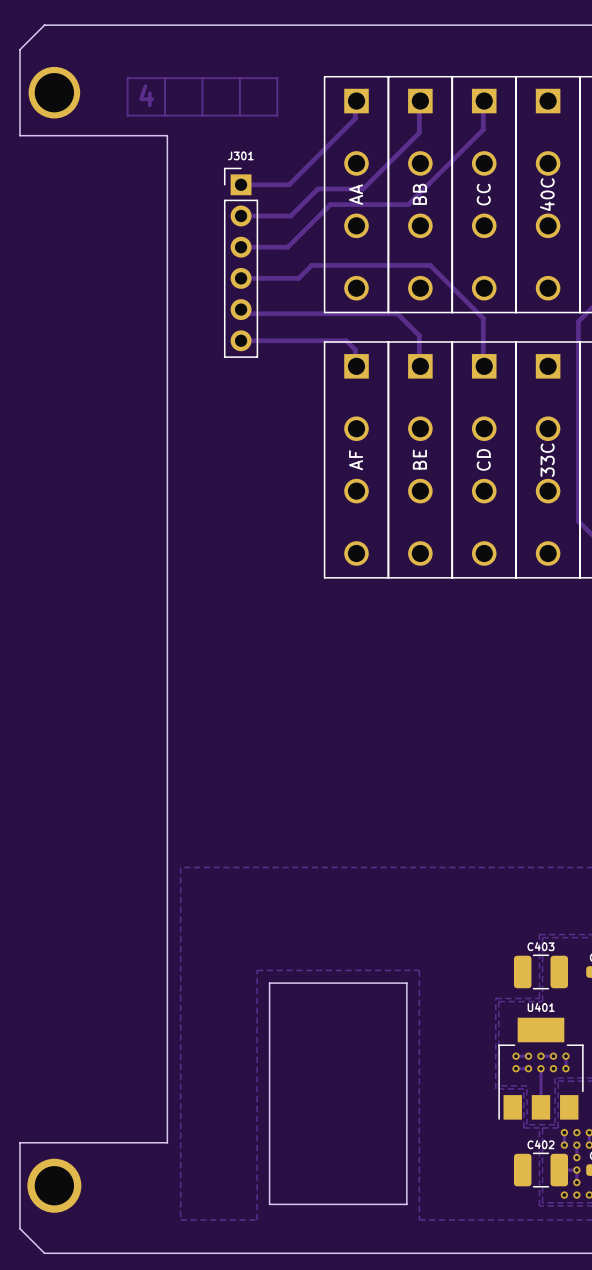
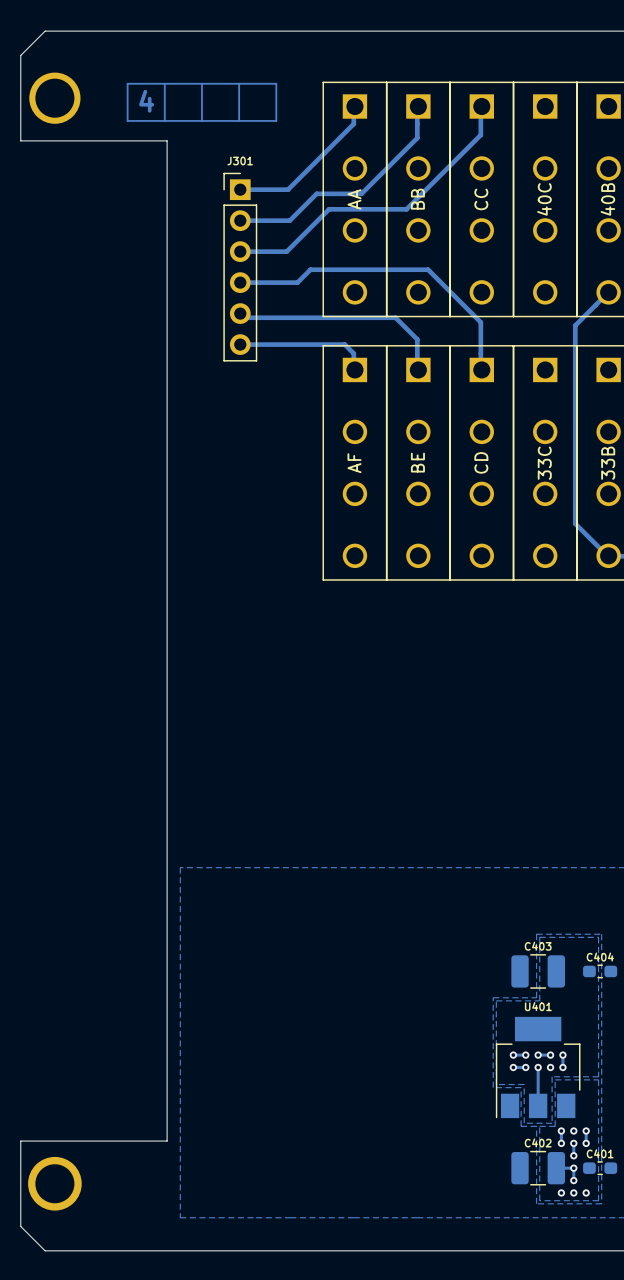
board edge: (406, 983) (269, 983) (269, 1204) (406, 1204) (406, 983) -> none
zone outline: (419, 1219) (419, 970) (257, 970) (257, 1219) -> (417, 1217) (256, 1217)

